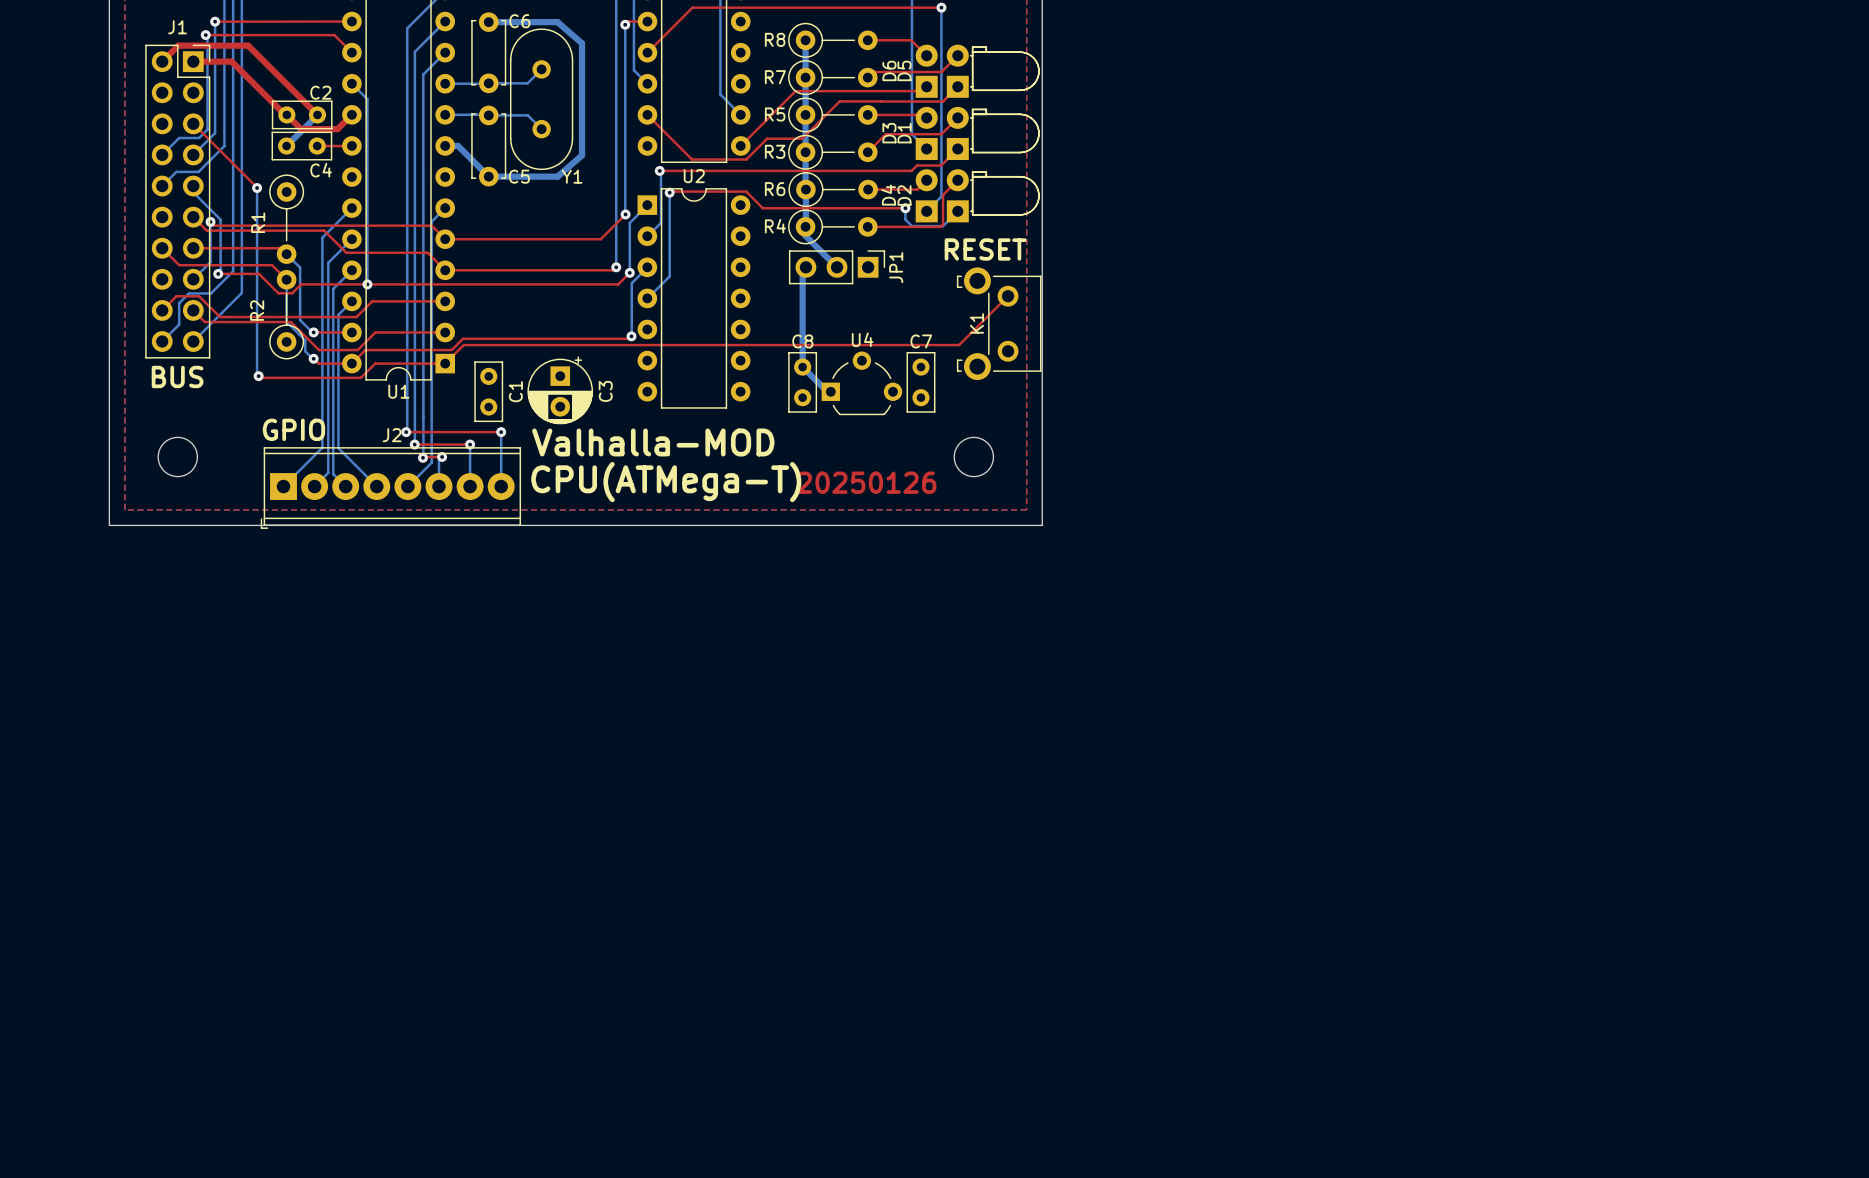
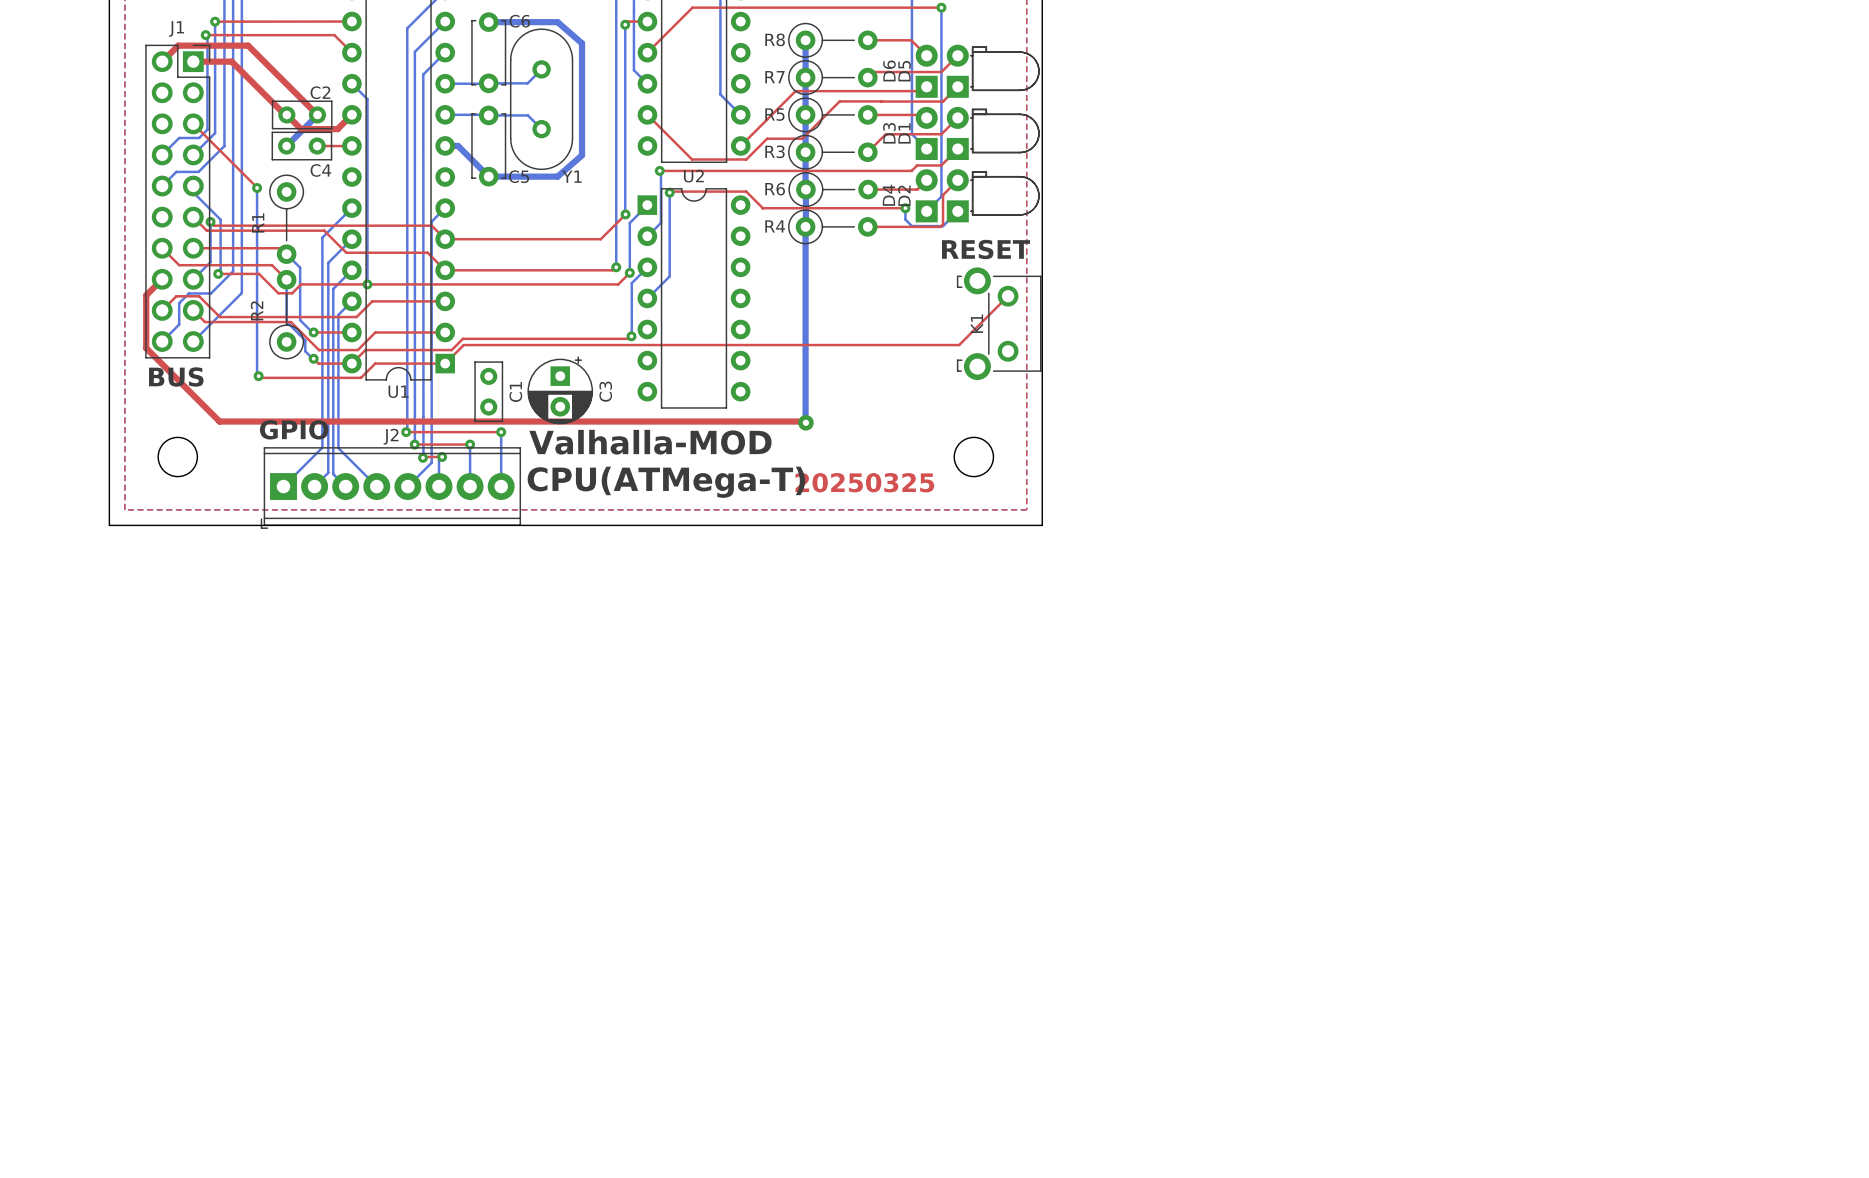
bottom track: (805, 235) (837, 267) -> (805, 235) (805, 422)
JP1: (837, 267) -> none
bottom track: (802, 270) (802, 367) (827, 391) -> none
top track: none -> (162, 279) (146, 295) (146, 348) (219, 421) (805, 422)
C8: (802, 382) -> none
C7: (920, 382) -> none
U4: (861, 383) -> none
via: none -> (805, 422)
text: 20250126 (866, 482) -> 20250325 (864, 482)

